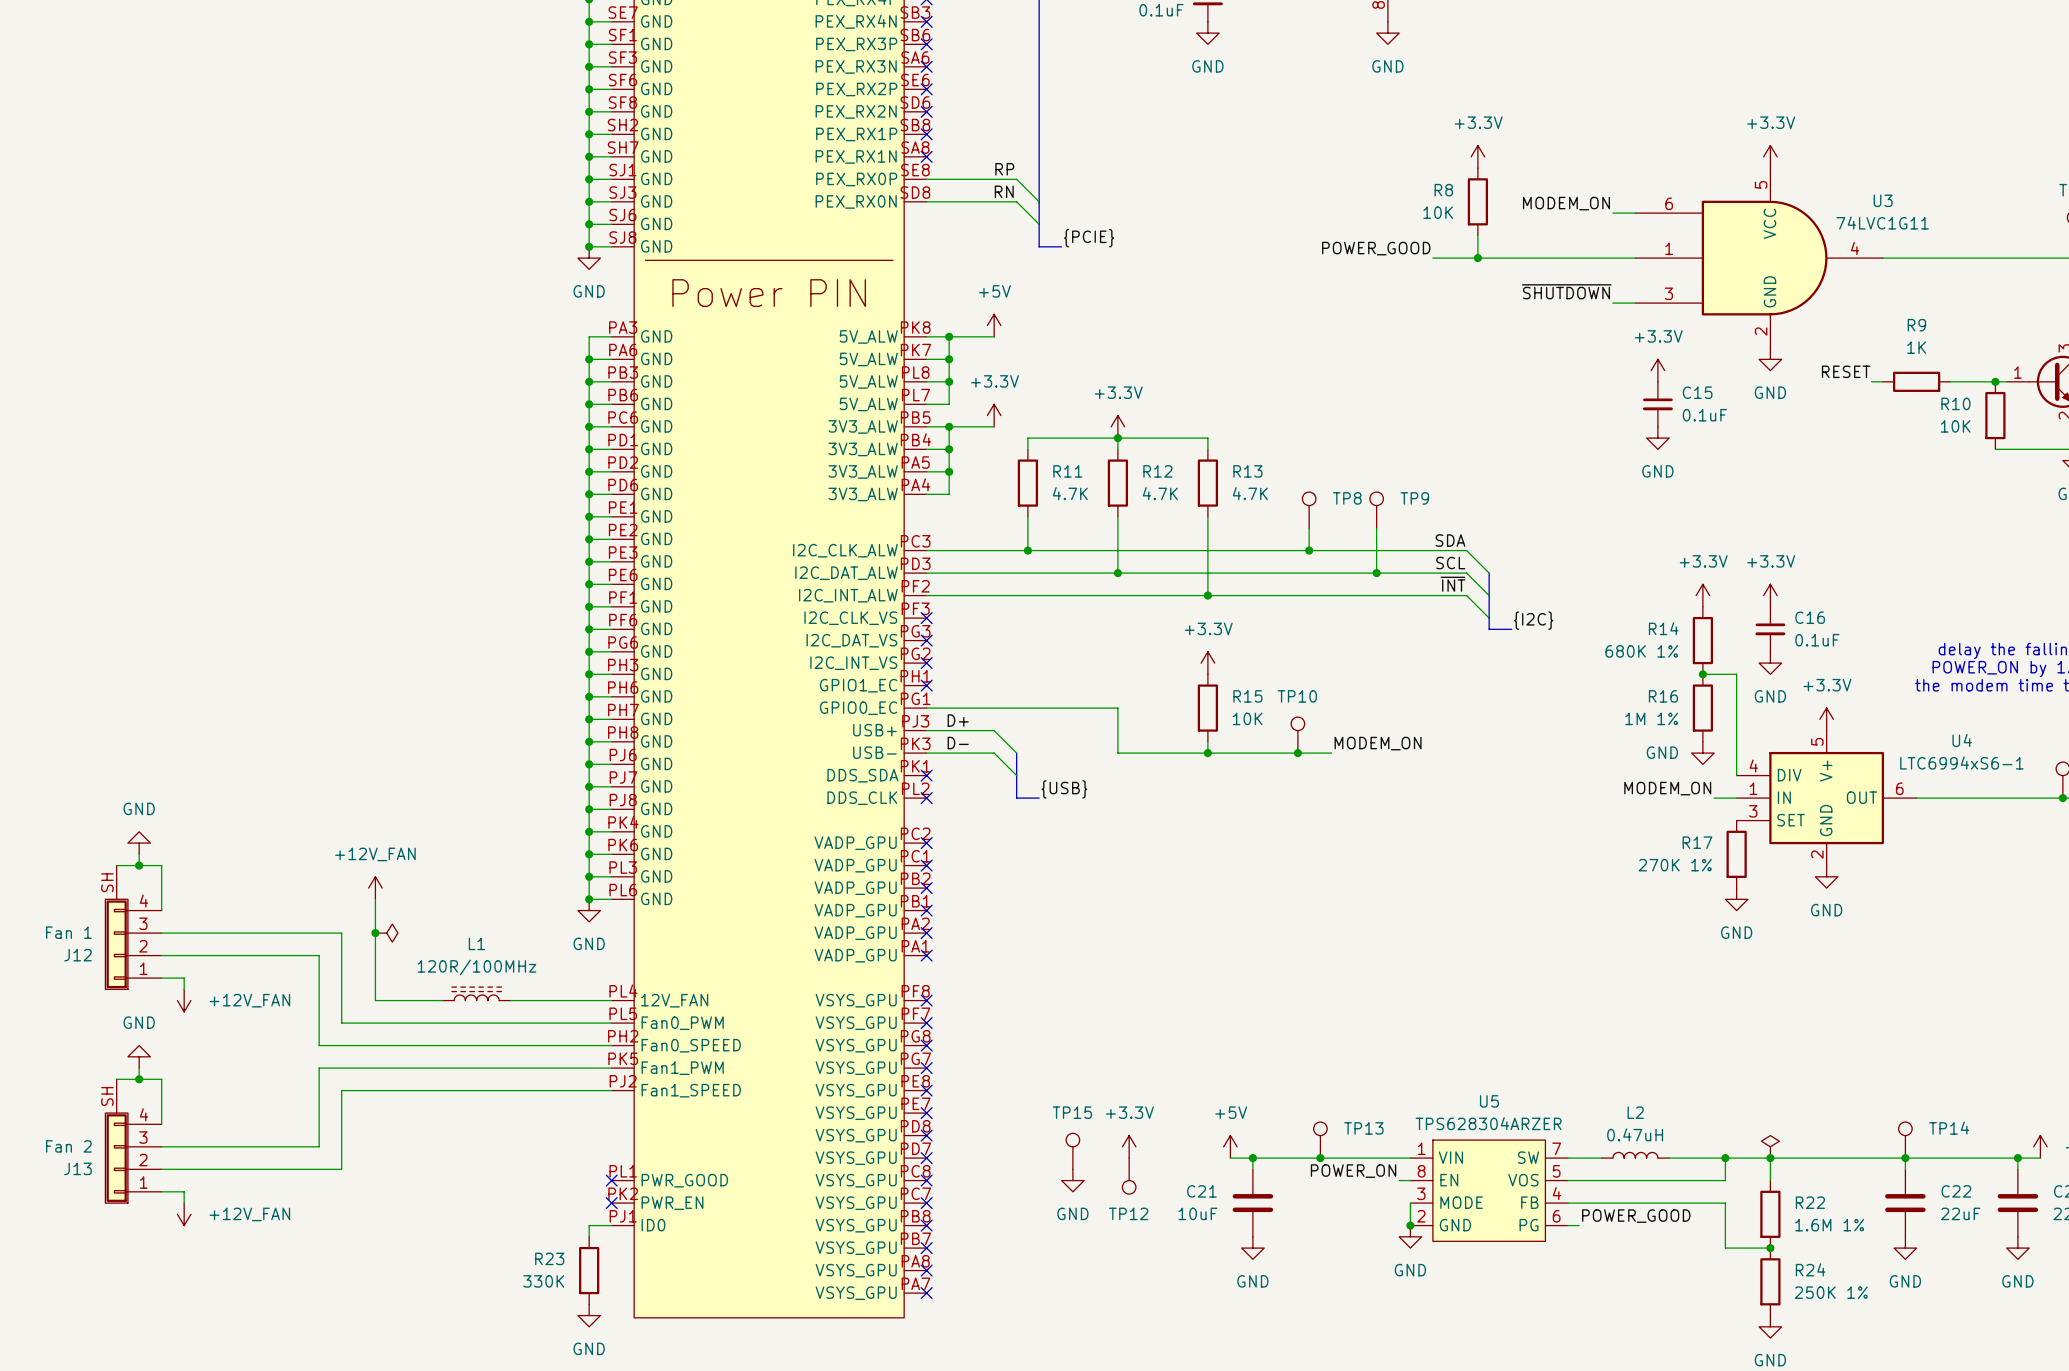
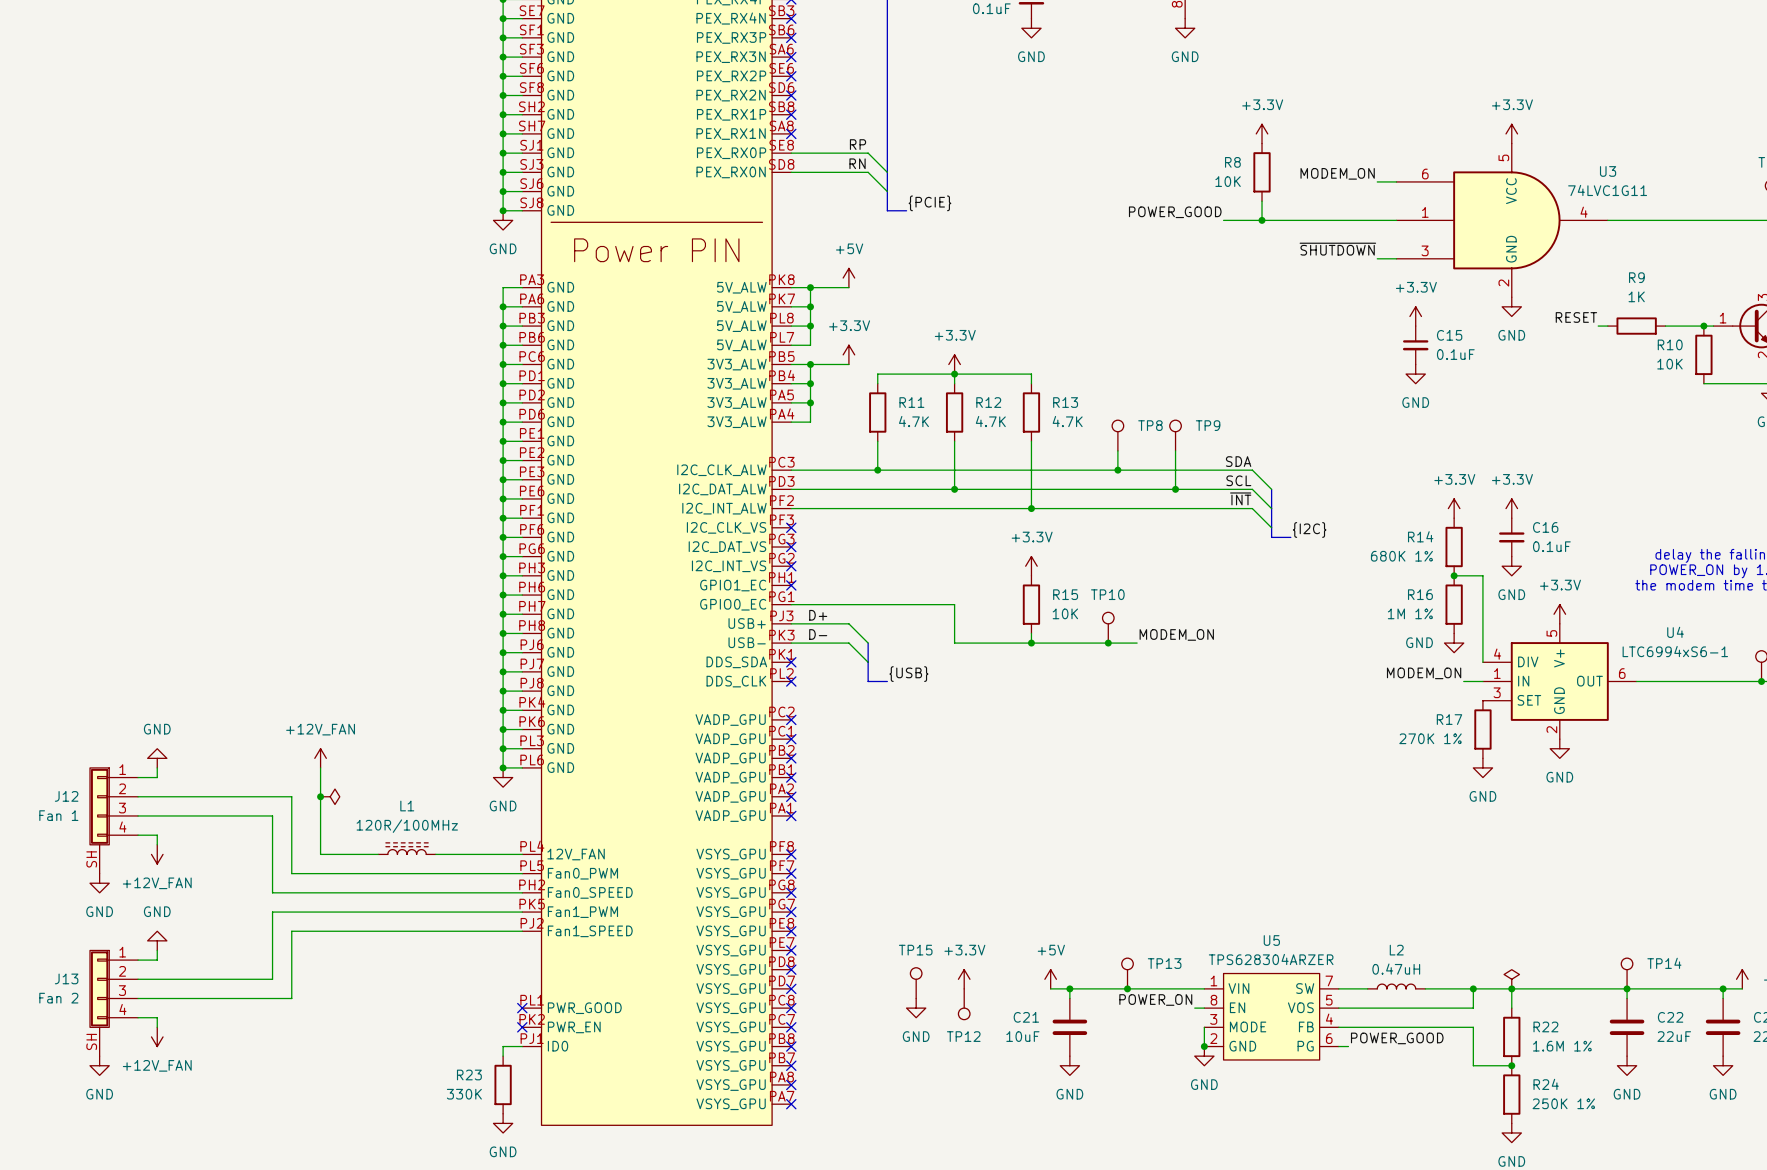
power symbol position: GND (139, 843) -> GND (157, 758)
wire: (139, 854) (139, 865) -> none
wire: (116, 865) (161, 865) (161, 910) -> (157, 767) (157, 777) (138, 777)
junction: (139, 865) -> none
J12 flip: as is (116, 944) -> up-down (99, 806)
power symbol text position: +12V_FAN (249, 1000) -> +12V_FAN (157, 883)
power symbol: none -> GND (99, 883)
power symbol: GND (139, 1056) -> none
wire: (139, 1068) (139, 1079) -> none
wire: (116, 1079) (161, 1079) (161, 1124) -> (157, 950) (157, 960) (138, 960)
junction: (139, 1079) -> none
power symbol: none -> GND (157, 940)
J13 flip: as is (116, 1158) -> up-down (99, 988)
power symbol text position: +12V_FAN (249, 1214) -> +12V_FAN (157, 1065)
power symbol: none -> GND (99, 1065)

